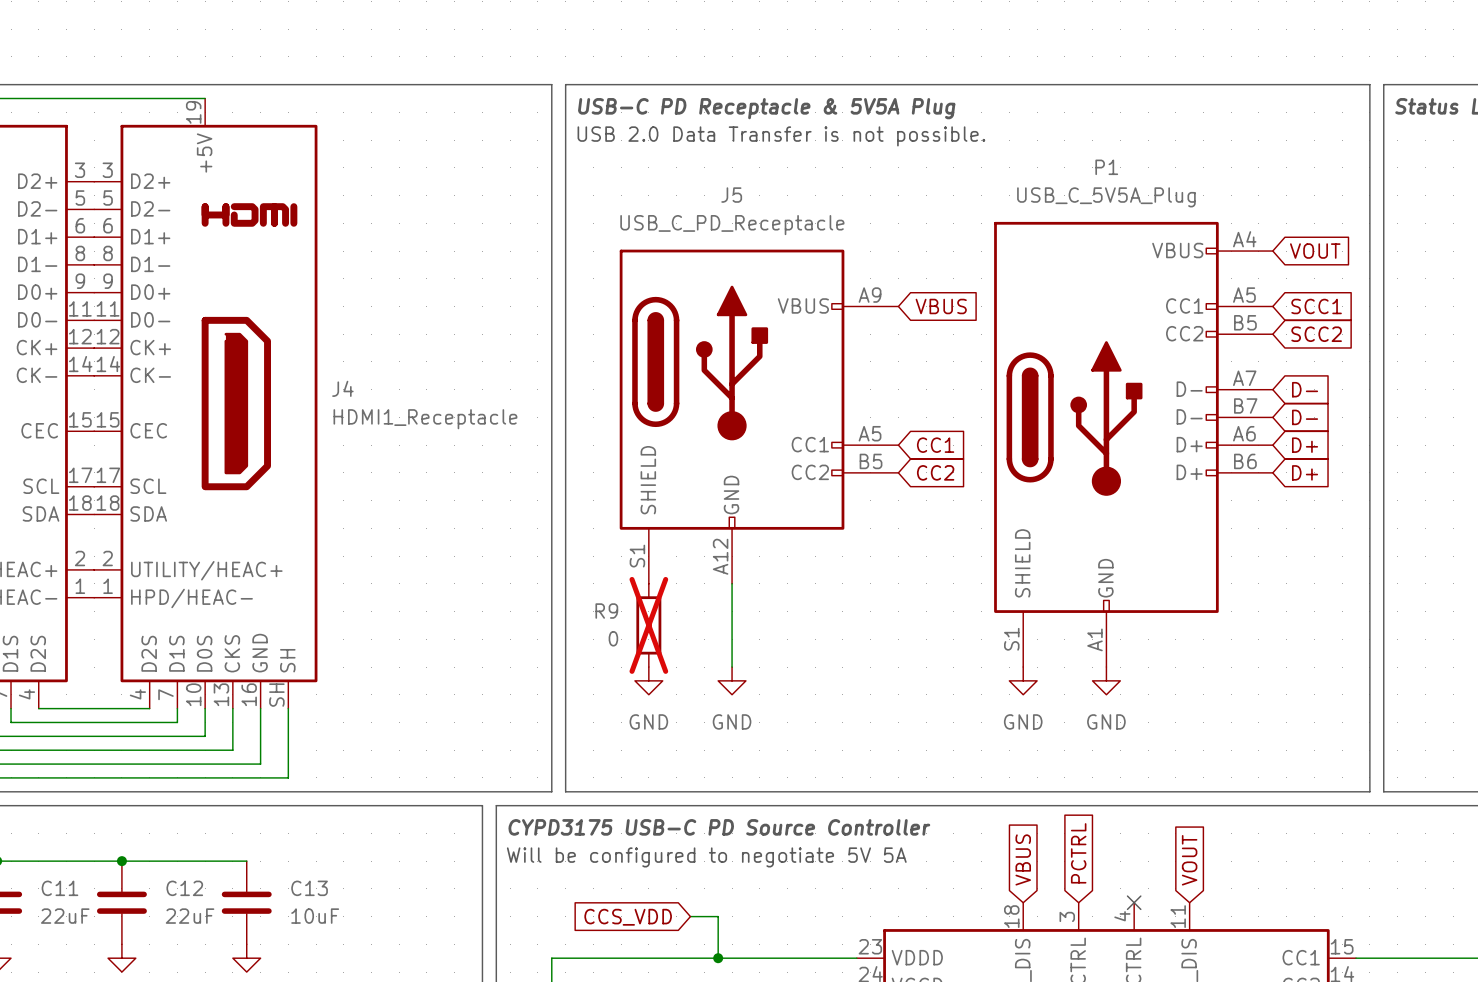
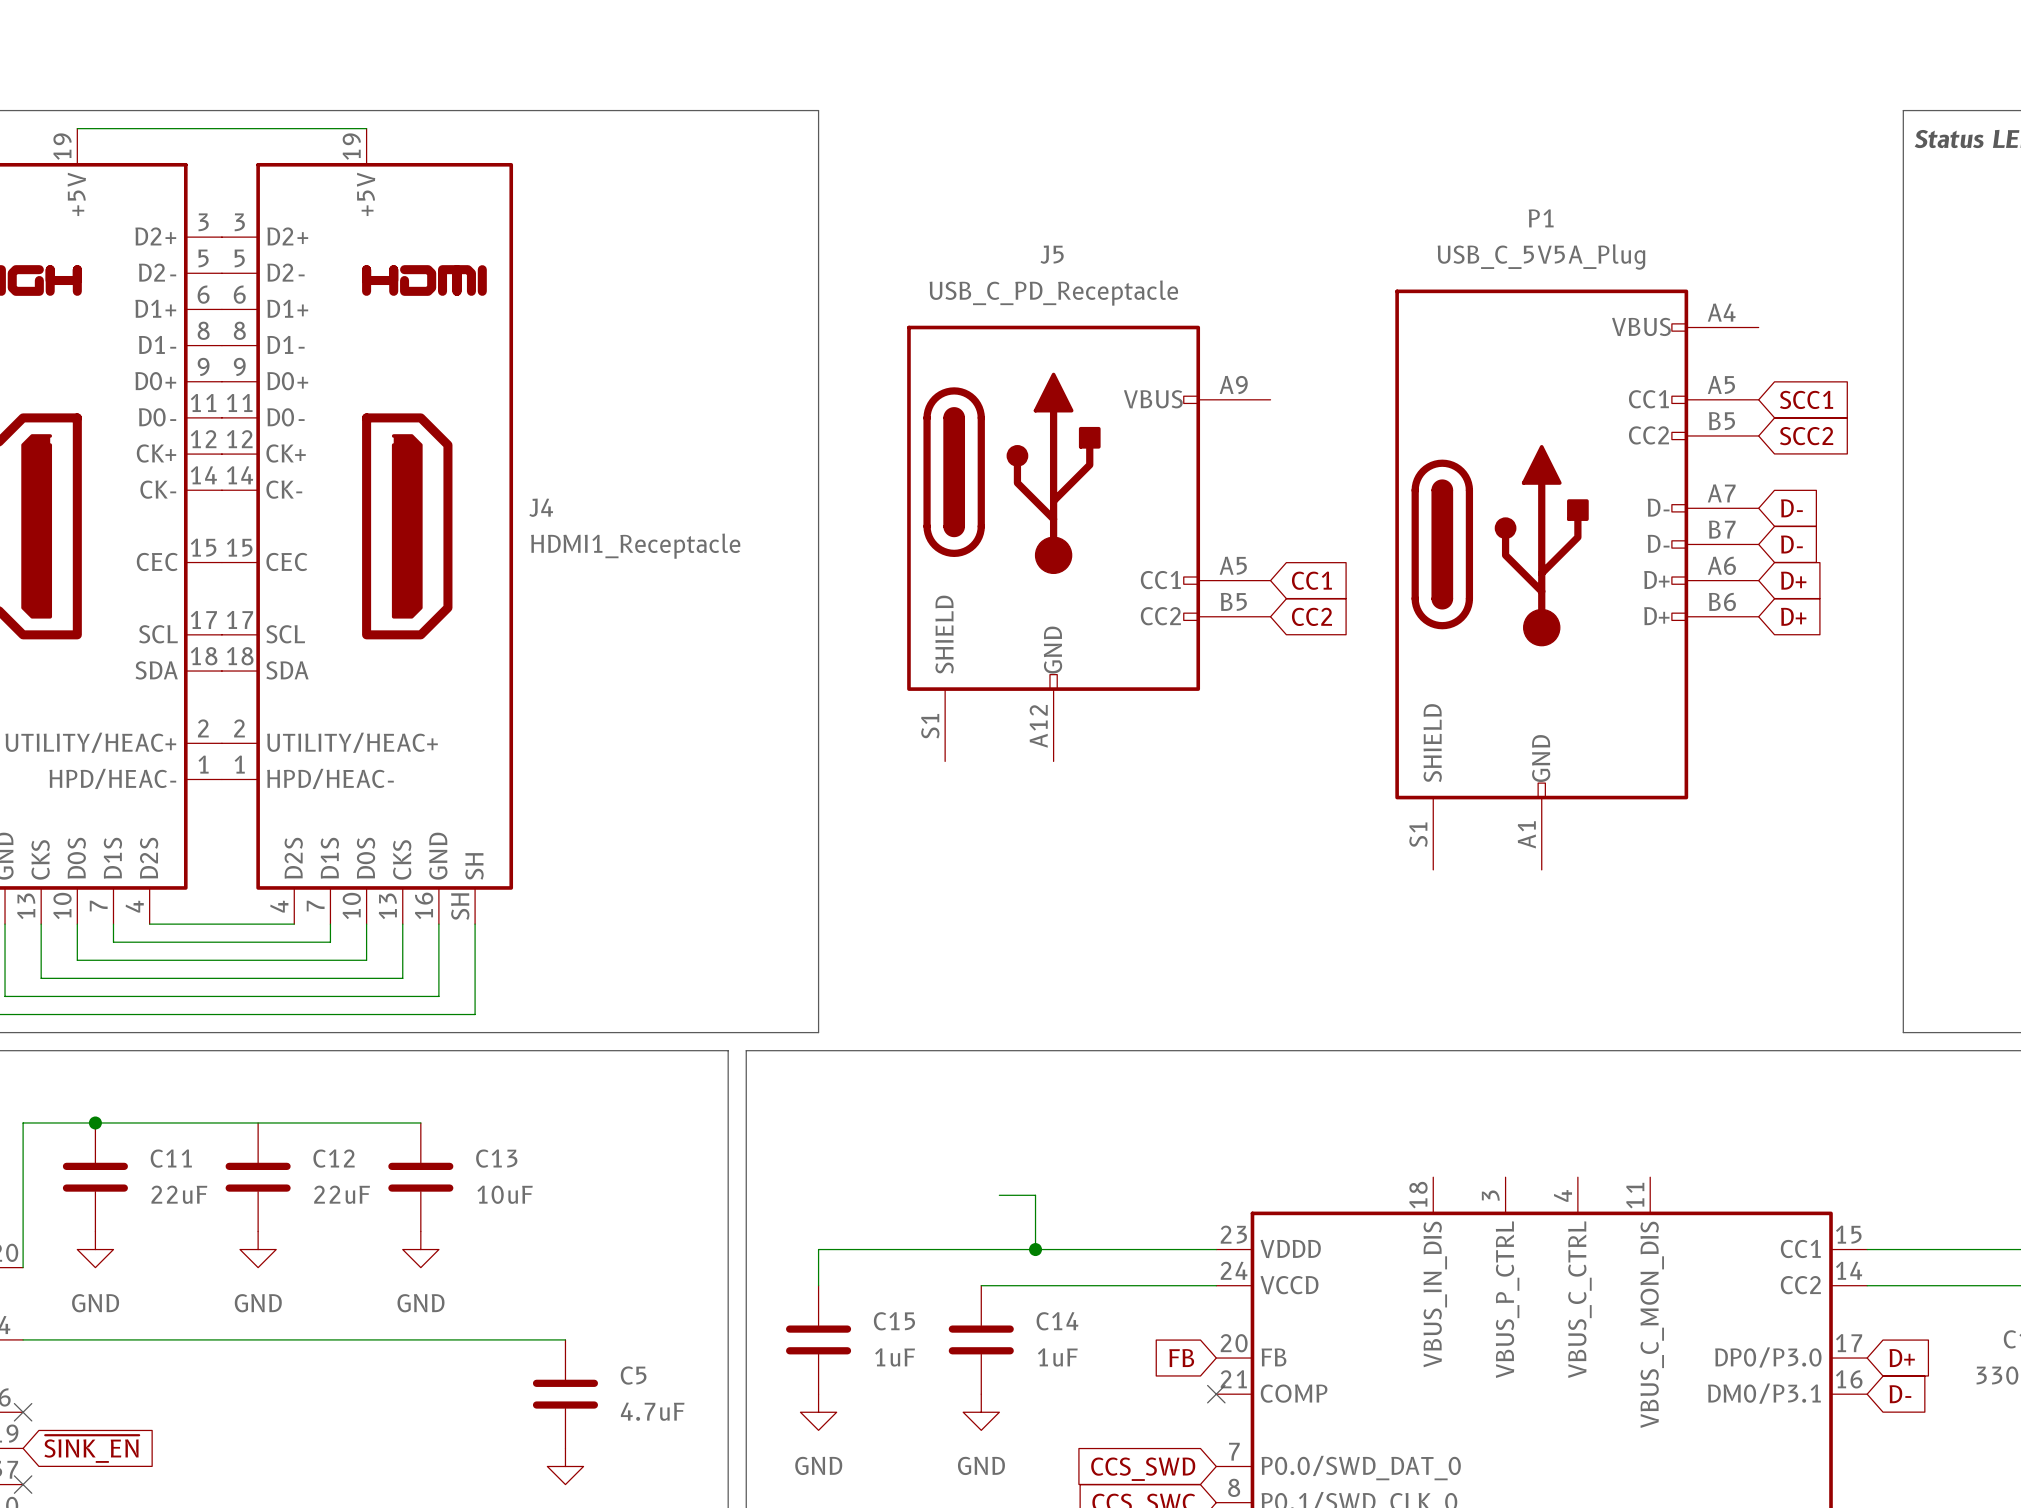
line: (565, 84) (1369, 84) (1369, 791) (565, 791) (565, 84) -> none
text: USB-C PD Receptacle & 5V5A Plug (766, 108) -> none
text: USB 2.0 Data Transfer is not possible. (781, 136) -> none
global label: VOUT (1315, 251) -> none
global label: VBUS (941, 306) -> none
wire: (732, 583) (732, 667) -> none
R9: 0 (648, 625) -> none
power symbol: GND (648, 680) -> none
power symbol: GND (732, 680) -> none
power symbol: GND (1023, 680) -> none
power symbol: GND (1106, 680) -> none
text: CYPD3175 USB-C PD Source Controller (719, 827) -> none
global label: PCTRL (1078, 853) -> none
text: Will be configured to negotiate 5V 5A (706, 857) -> none
global label: VBUS (1023, 859) -> none
global label: VOUT (1189, 860) -> none
junction: (121, 861) -> none
no-connect mark: (1134, 902) -> none
global label: CCS_VDD (628, 917) -> none

